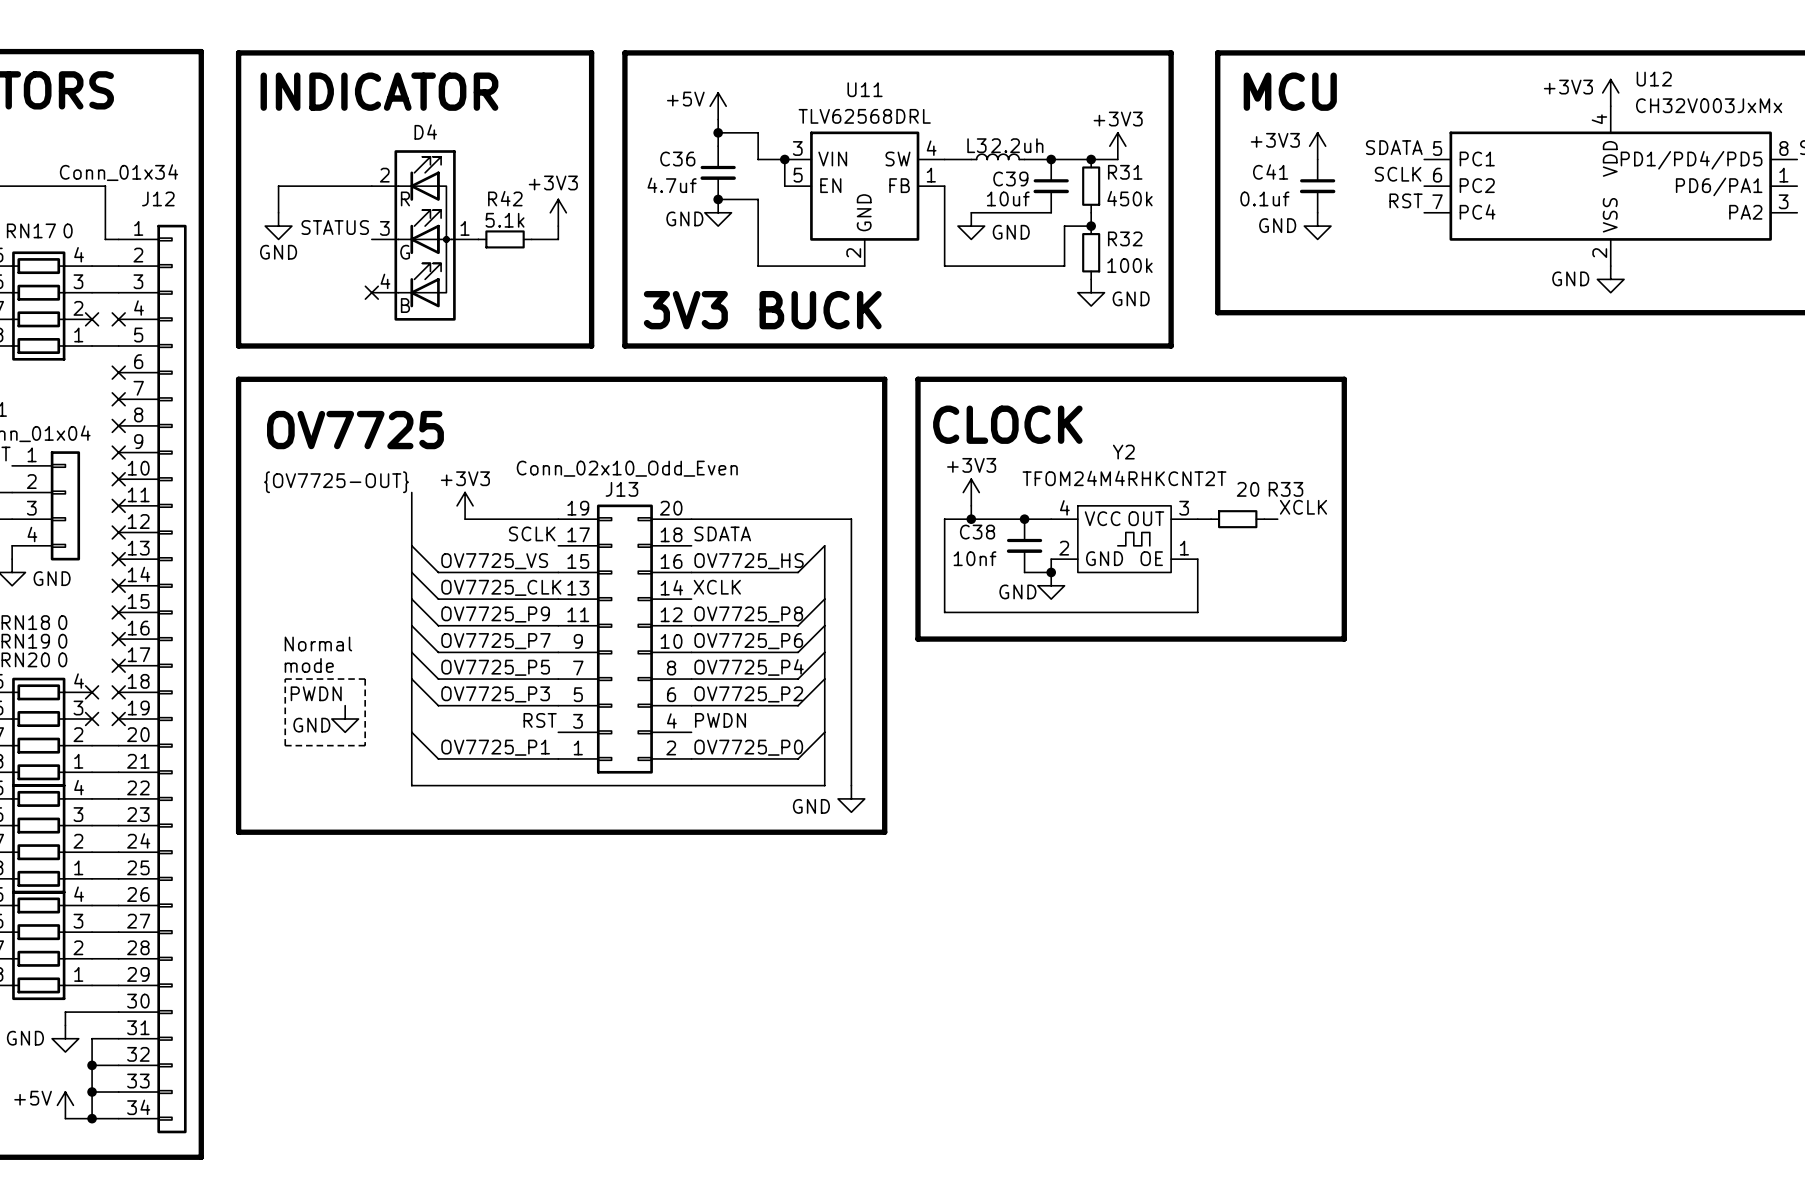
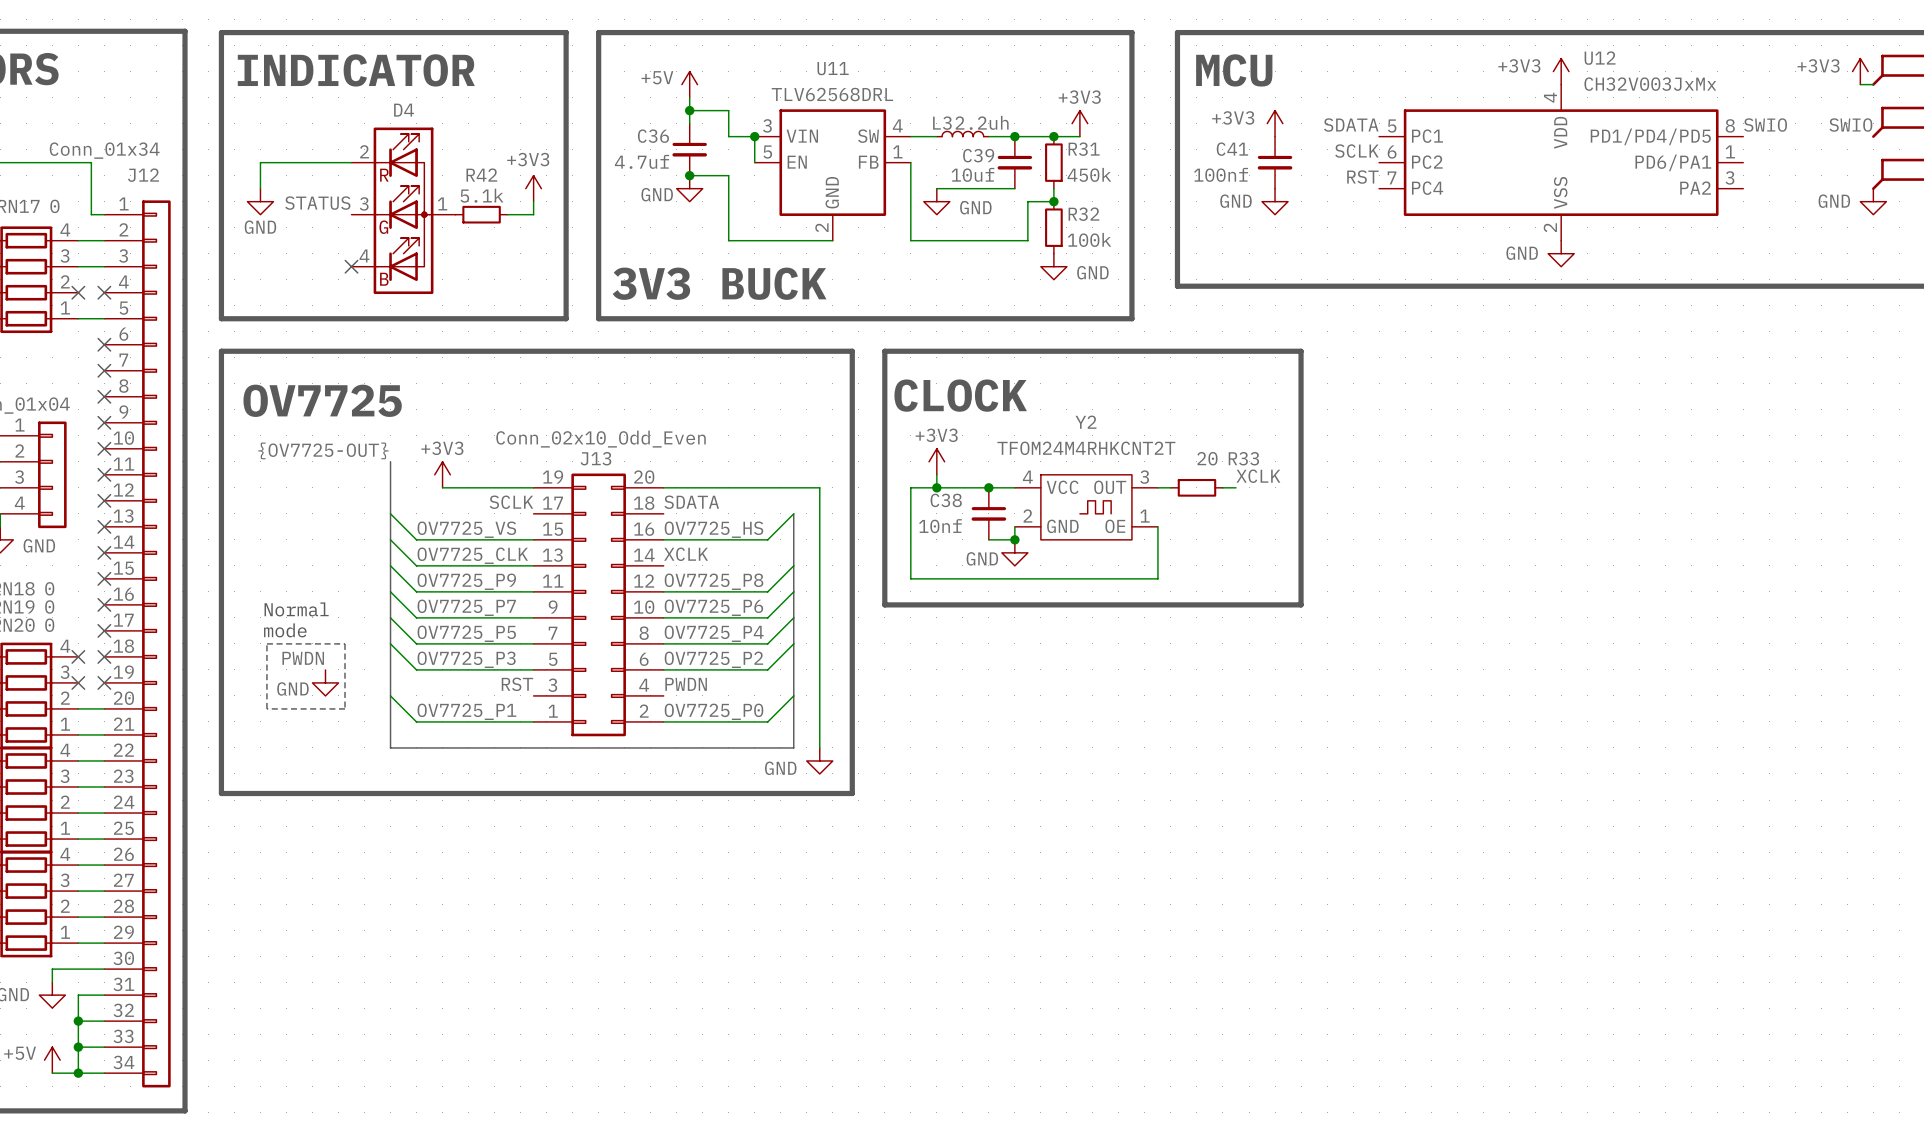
C41 value: 0.1uf (1264, 198) -> 100nf (1221, 174)

